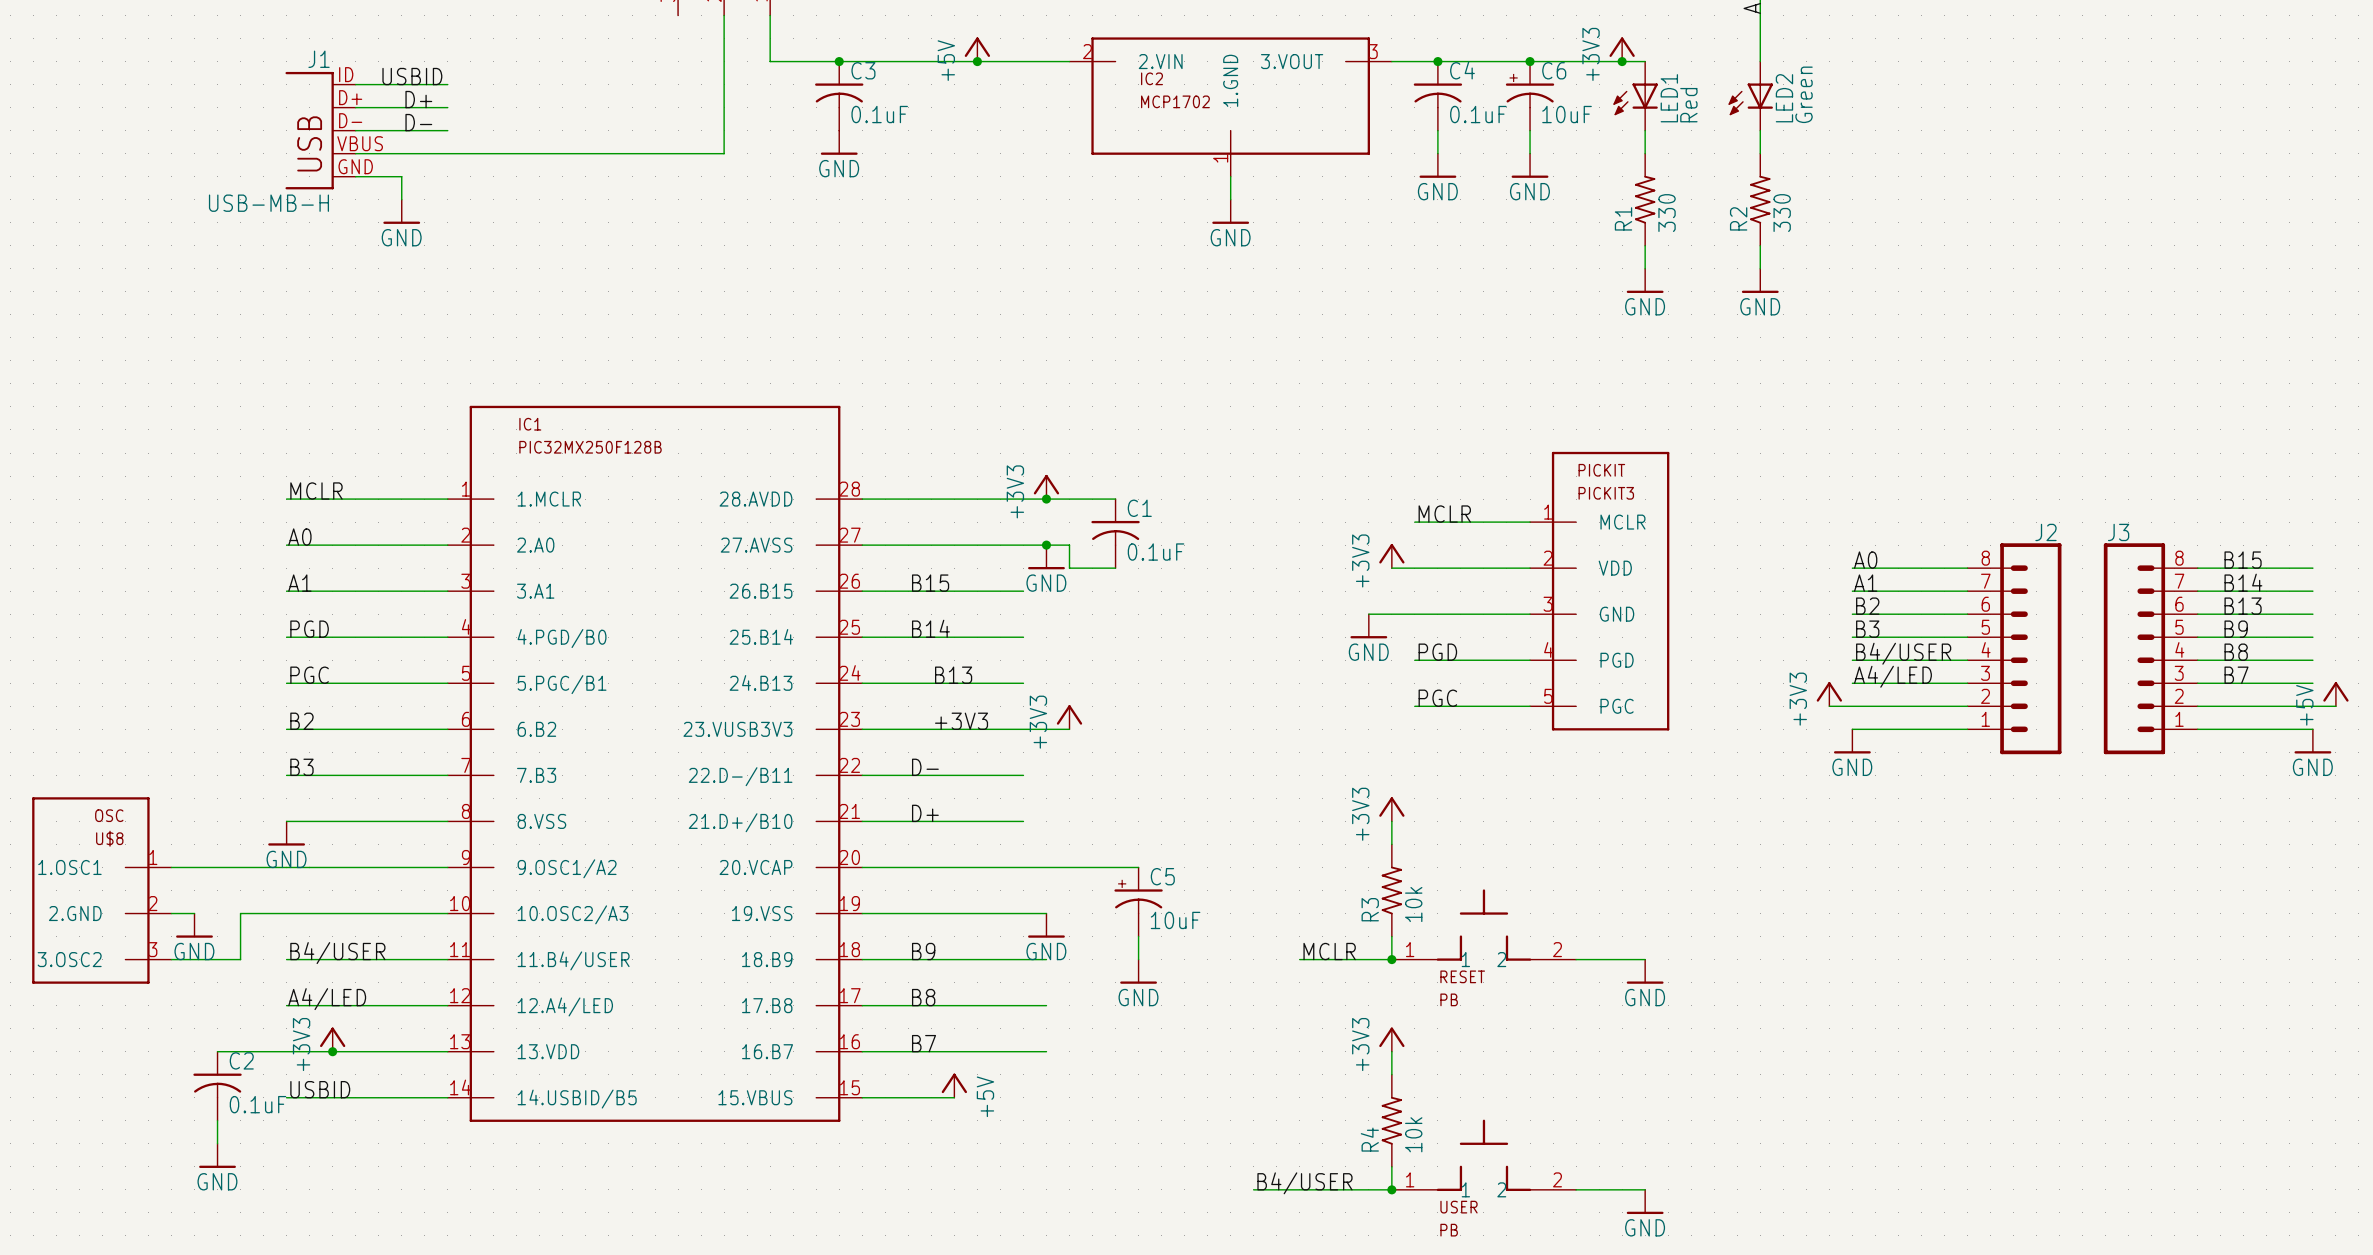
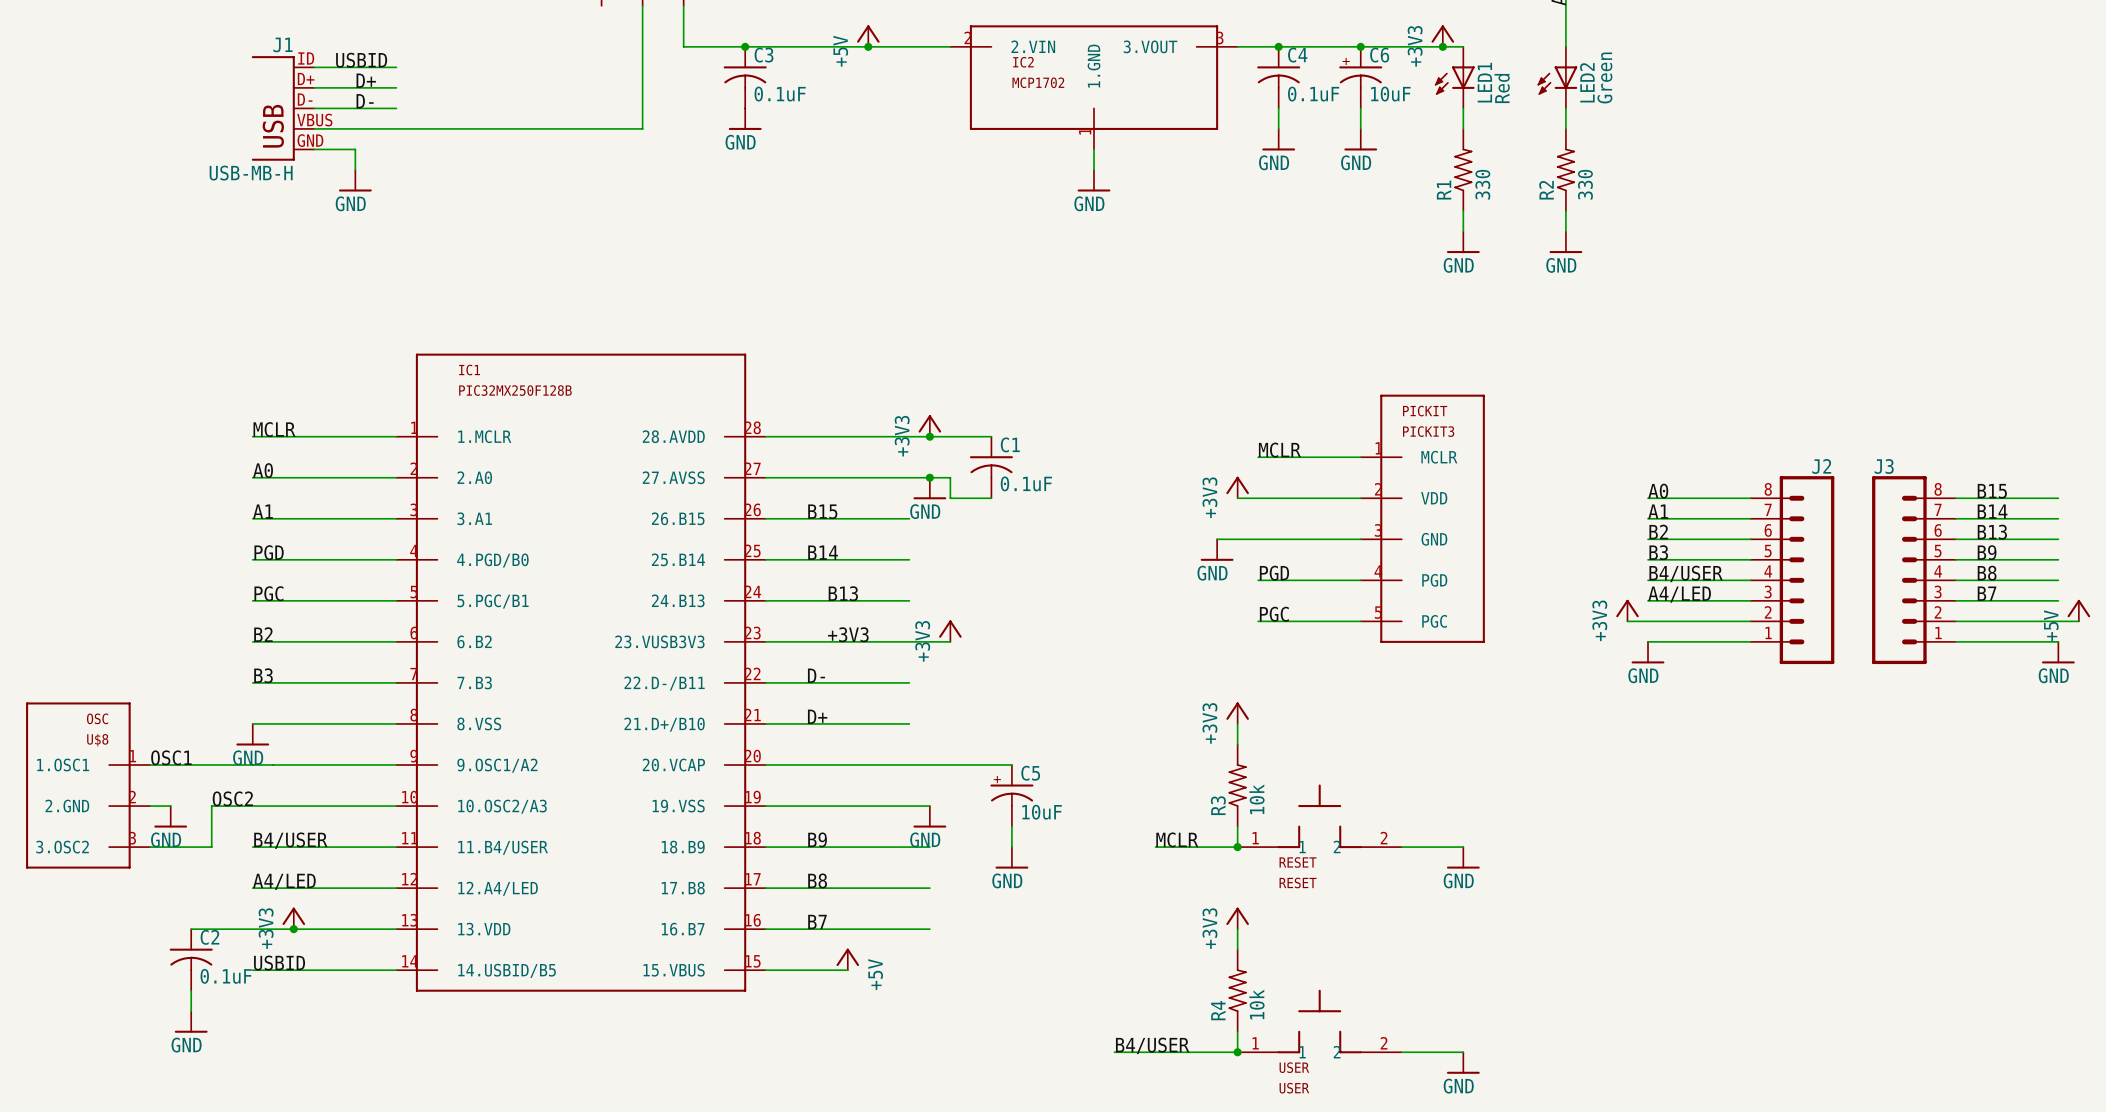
label: none -> OSC1 (171, 757)
label: none -> OSC2 (232, 798)
RESET value: PB (1449, 999) -> RESET (1298, 882)
USER value: PB (1449, 1230) -> USER (1294, 1088)

